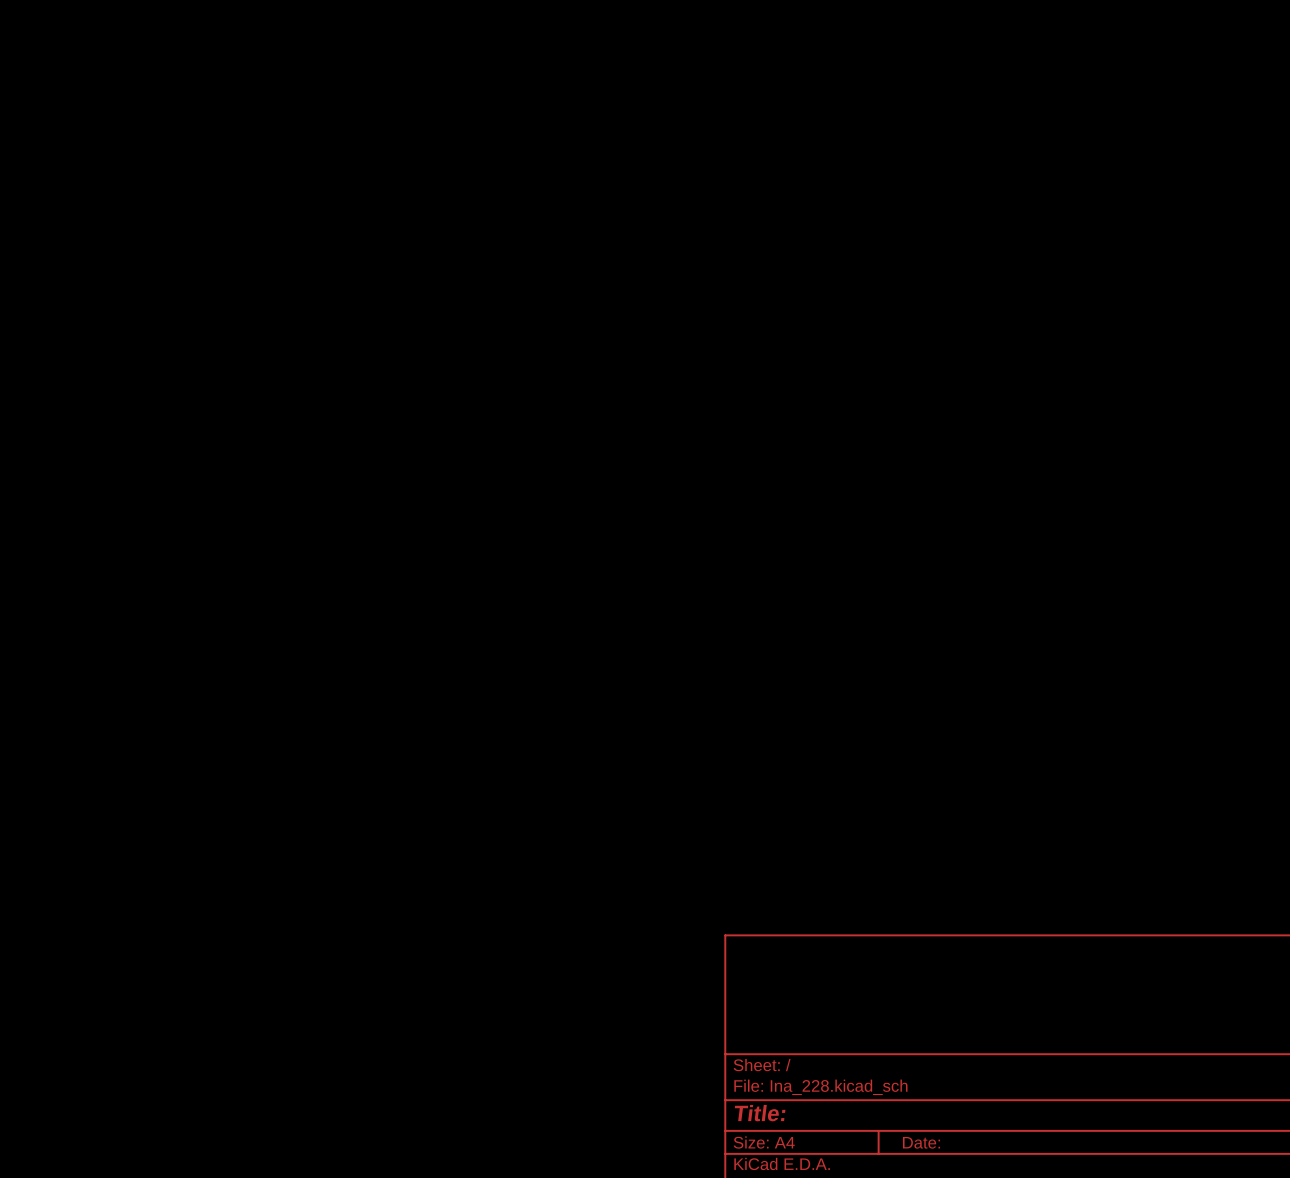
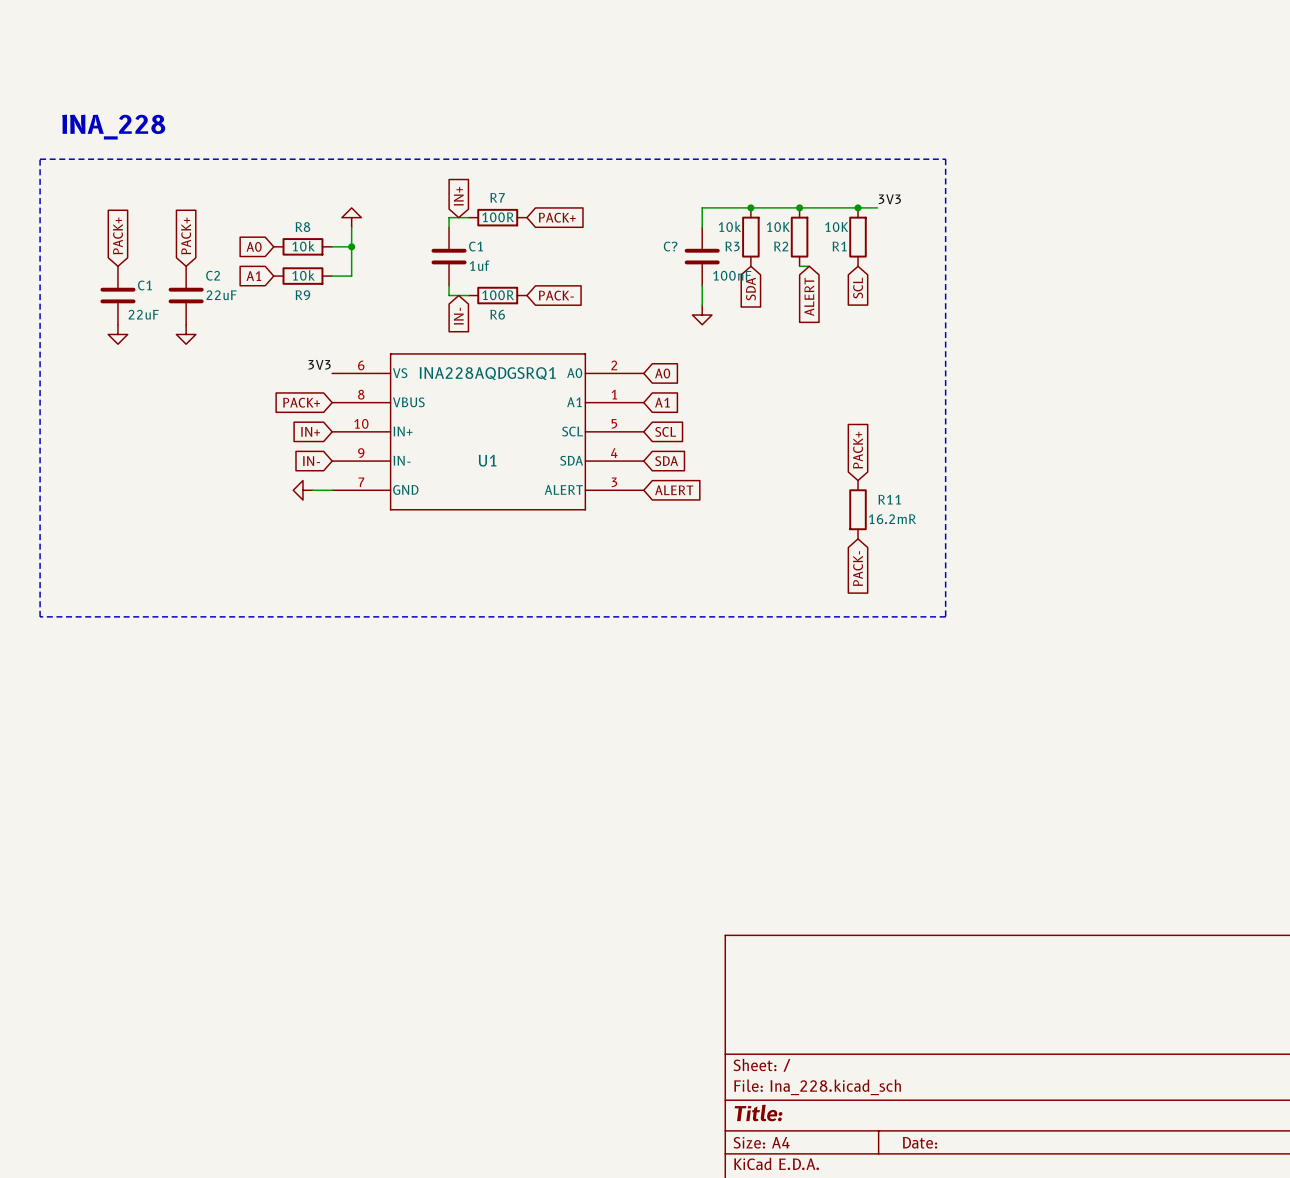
text: none -> INA_228 (113, 127)
line: none -> (40, 159) (945, 159) (945, 616) (40, 616) (40, 159)
global label: none -> IN+ (458, 196)
label: none -> 3V3 (889, 199)
junction: none -> (750, 207)
junction: none -> (799, 207)
junction: none -> (858, 207)
wire: none -> (877, 207) (702, 207) (702, 227)
power symbol: none -> (351, 217)
wire: none -> (468, 217) (449, 217) (449, 227)
R7: none -> 100R (497, 217)
global label: none -> PACK+ (557, 217)
wire: none -> (351, 227) (351, 276) (332, 276)
global label: none -> PACK+ (118, 235)
global label: none -> PACK+ (186, 235)
R3: none -> 10k (750, 237)
R2: none -> 10K (799, 237)
R1: none -> 10K (858, 237)
global label: none -> A0 (254, 246)
R8: none -> 10k (302, 246)
wire: none -> (332, 246) (351, 246)
junction: none -> (351, 246)
C1: none -> 1uf (449, 256)
C?: none -> 100nF (702, 256)
wire: none -> (799, 266) (809, 266)
global label: none -> A1 (253, 276)
R9: none -> 10k (302, 276)
wire: none -> (449, 285) (449, 295) (468, 295)
wire: none -> (702, 285) (702, 305)
global label: none -> SCL (858, 288)
global label: none -> SDA (750, 289)
C1: none -> 22uF (117, 295)
C2: none -> 22uF (186, 295)
R6: none -> 100R (497, 295)
global label: none -> PACK- (556, 295)
global label: none -> ALERT (809, 296)
global label: none -> IN- (458, 316)
power symbol: none -> (702, 315)
power symbol: none -> (117, 334)
power symbol: none -> (186, 334)
label: none -> 3V3 (319, 364)
global label: none -> A0 (662, 373)
global label: none -> PACK+ (301, 402)
global label: none -> A1 (662, 402)
global label: none -> IN+ (310, 431)
U1: none -> INA228AQDGSRQ1 (487, 431)
global label: none -> SCL (665, 431)
global label: none -> PACK+ (858, 450)
global label: none -> IN- (311, 461)
global label: none -> SDA (666, 461)
power symbol: none -> (302, 490)
wire: none -> (312, 490) (332, 490)
global label: none -> ALERT (674, 490)
R11: none -> 16.2mR (858, 509)
global label: none -> PACK- (858, 568)

